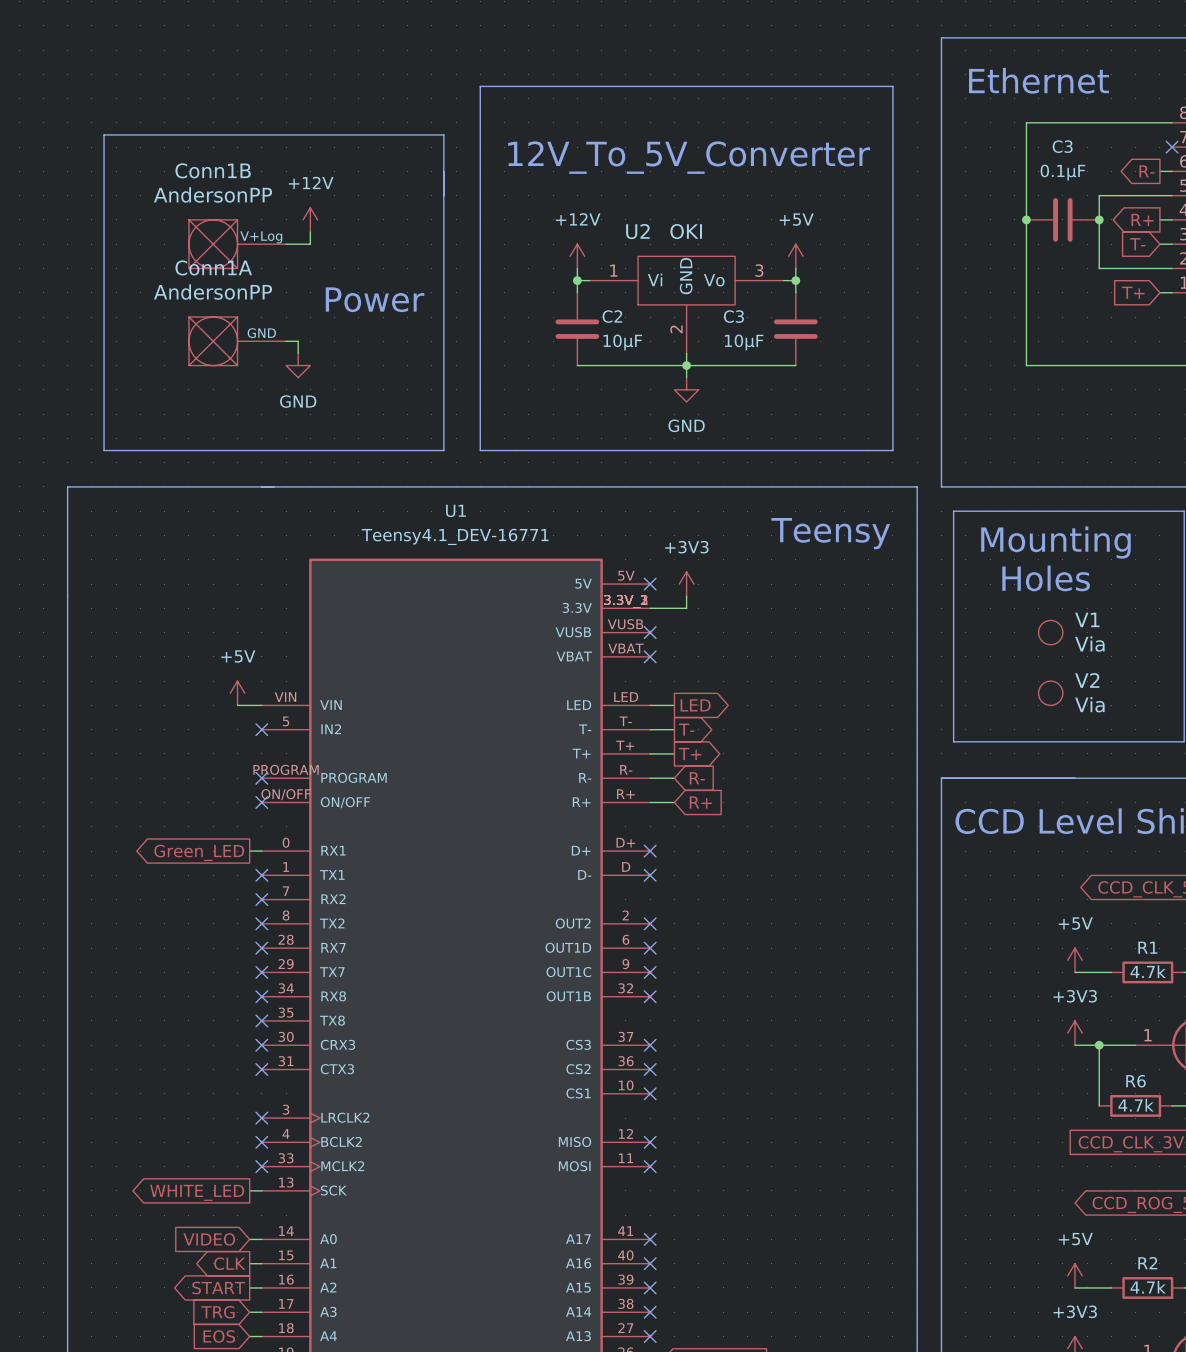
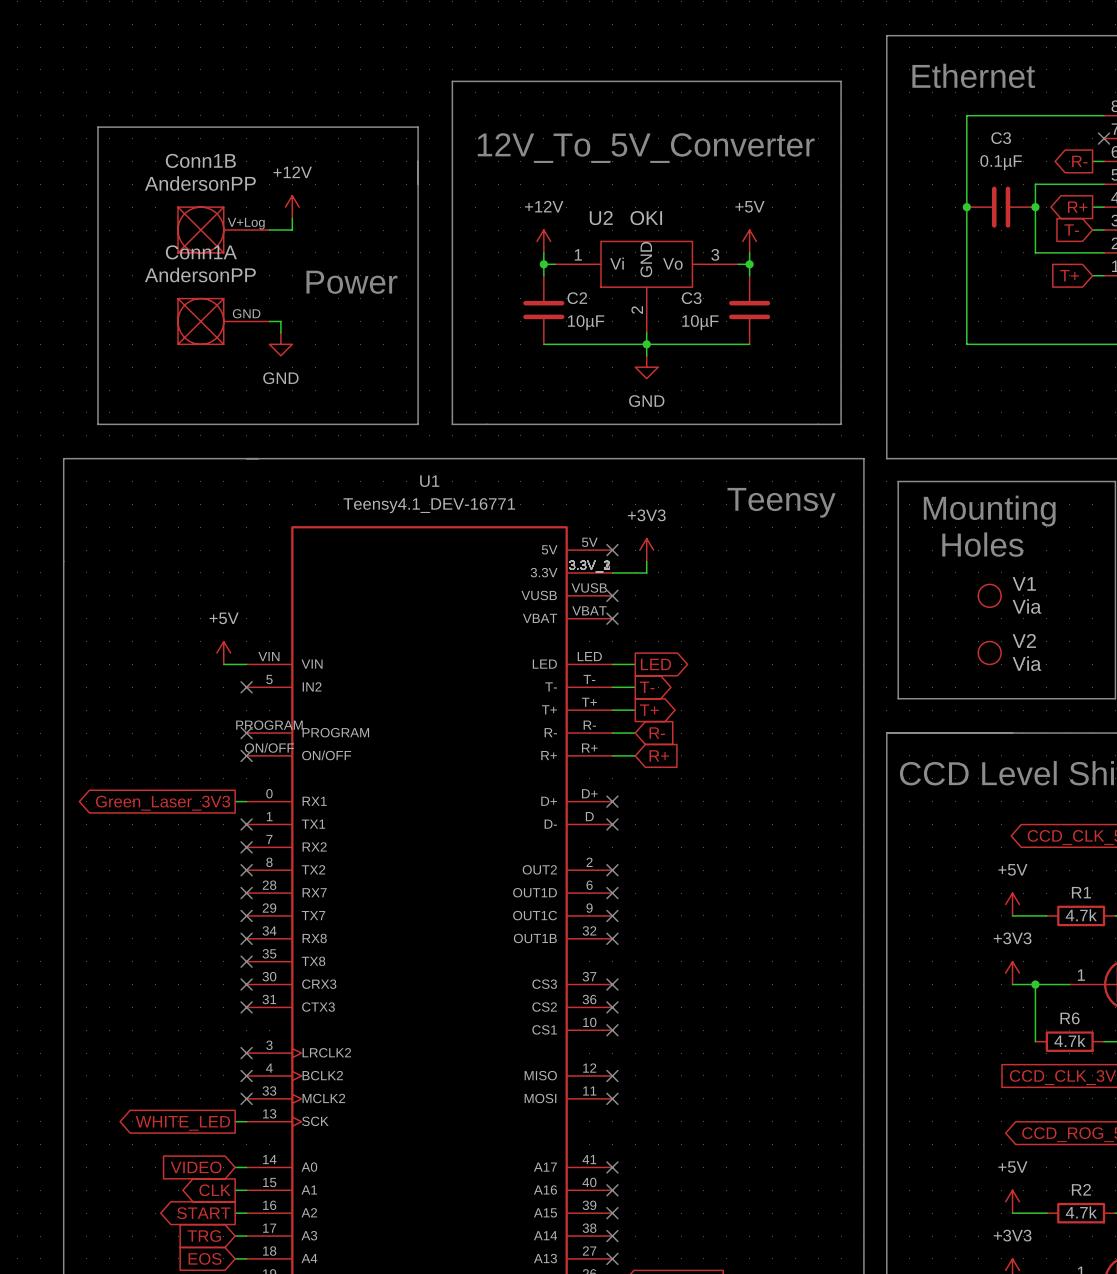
global label: Green_LED (199, 852) -> Green_Laser_3V3 (163, 803)

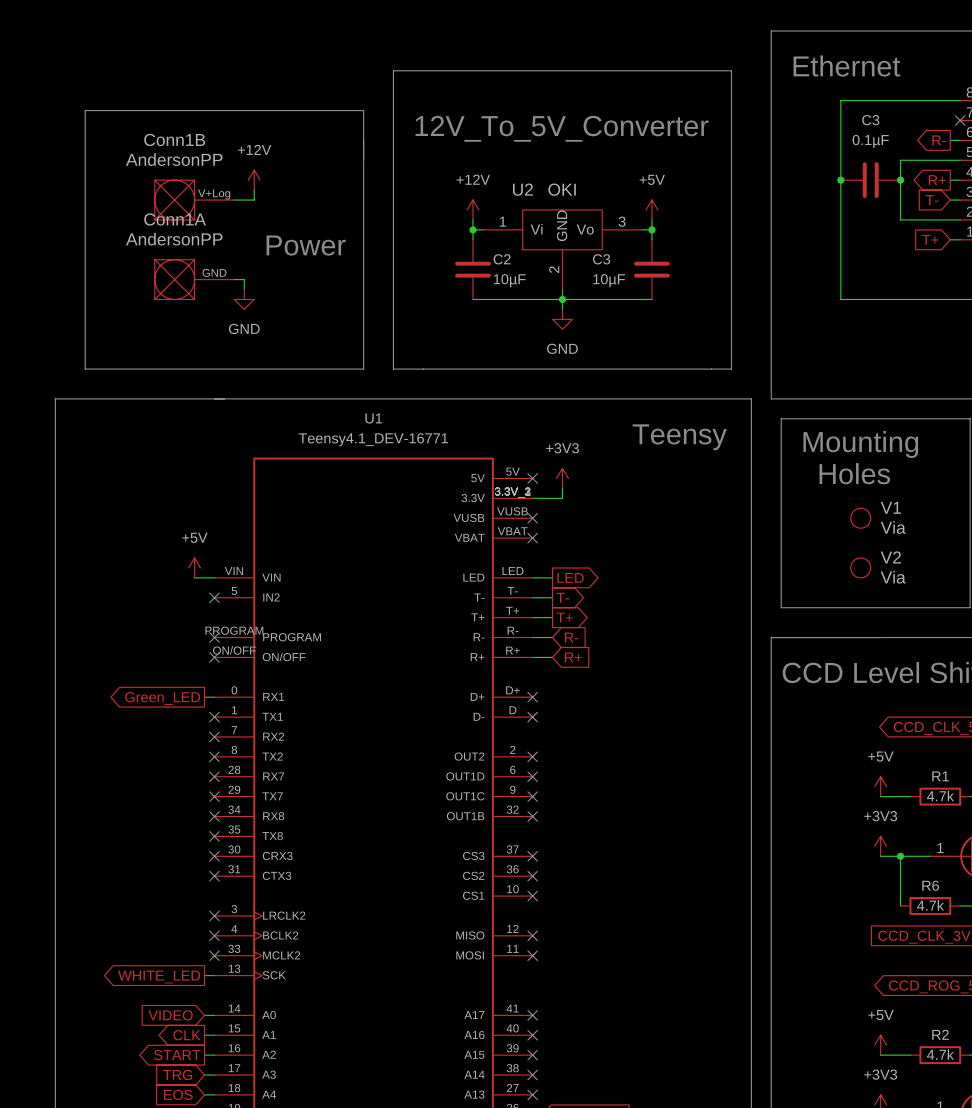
global label: Green_Laser_3V3 (163, 803) -> Green_LED (162, 698)

